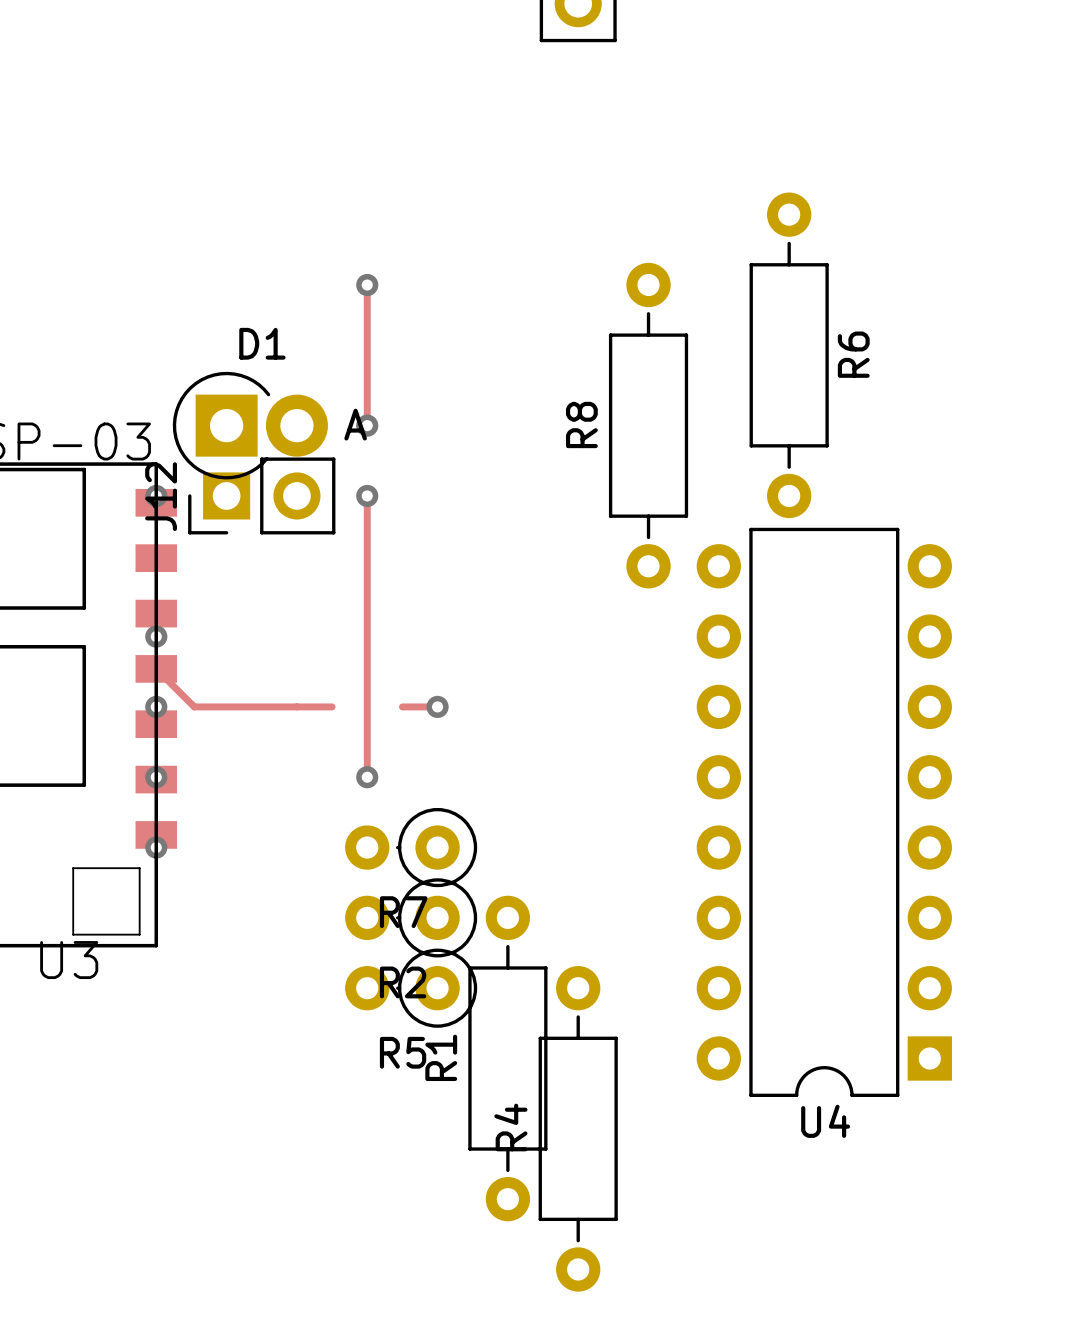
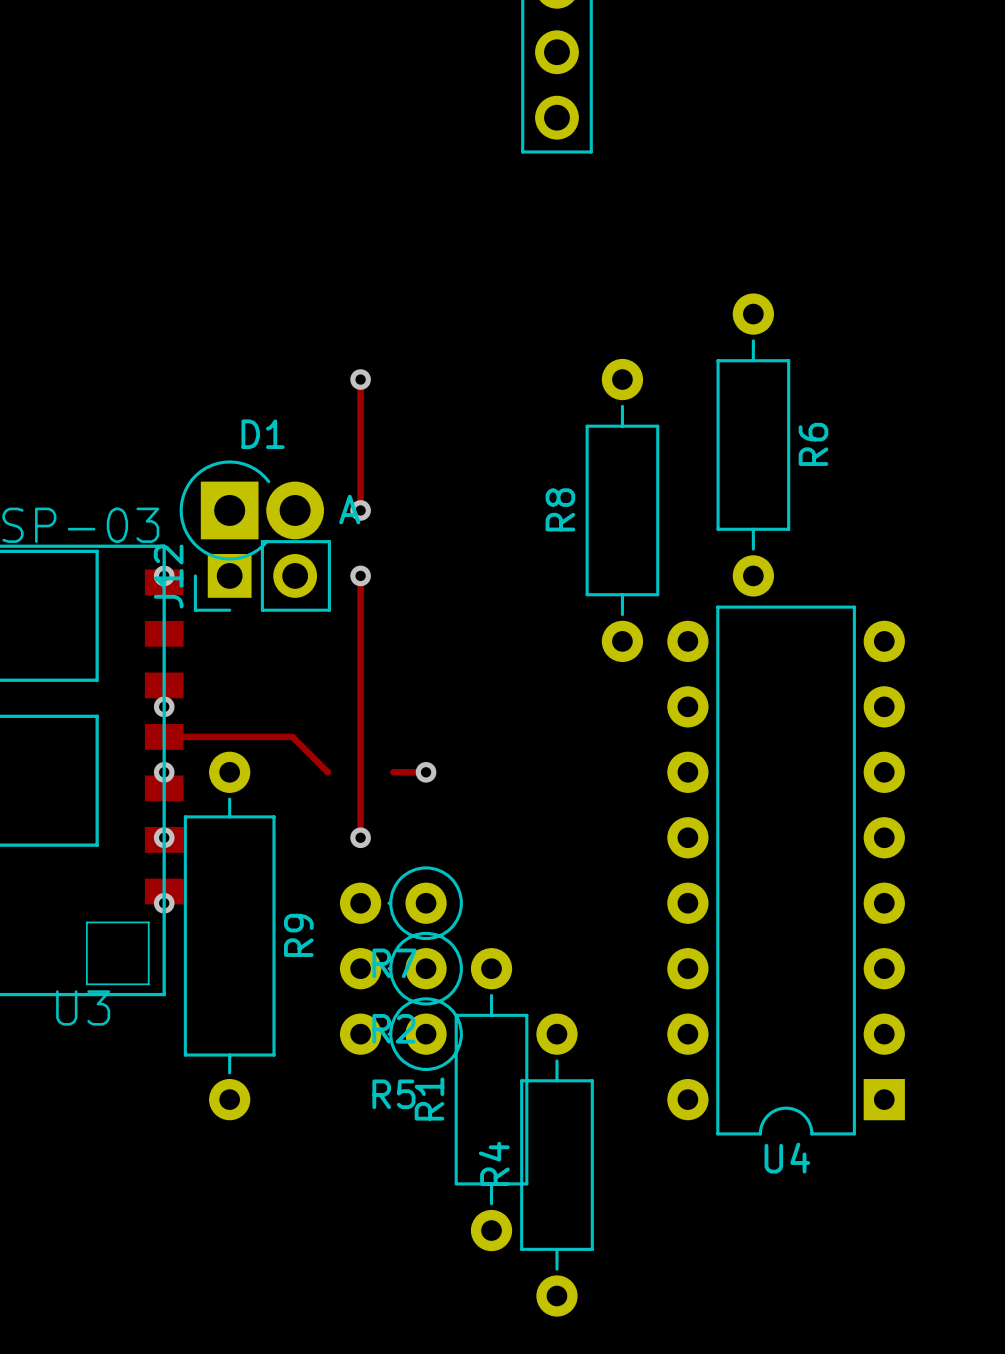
track: (156, 668) (194, 706) (332, 706) -> (164, 736) (292, 736) (327, 772)
R9: none -> (229, 935)

